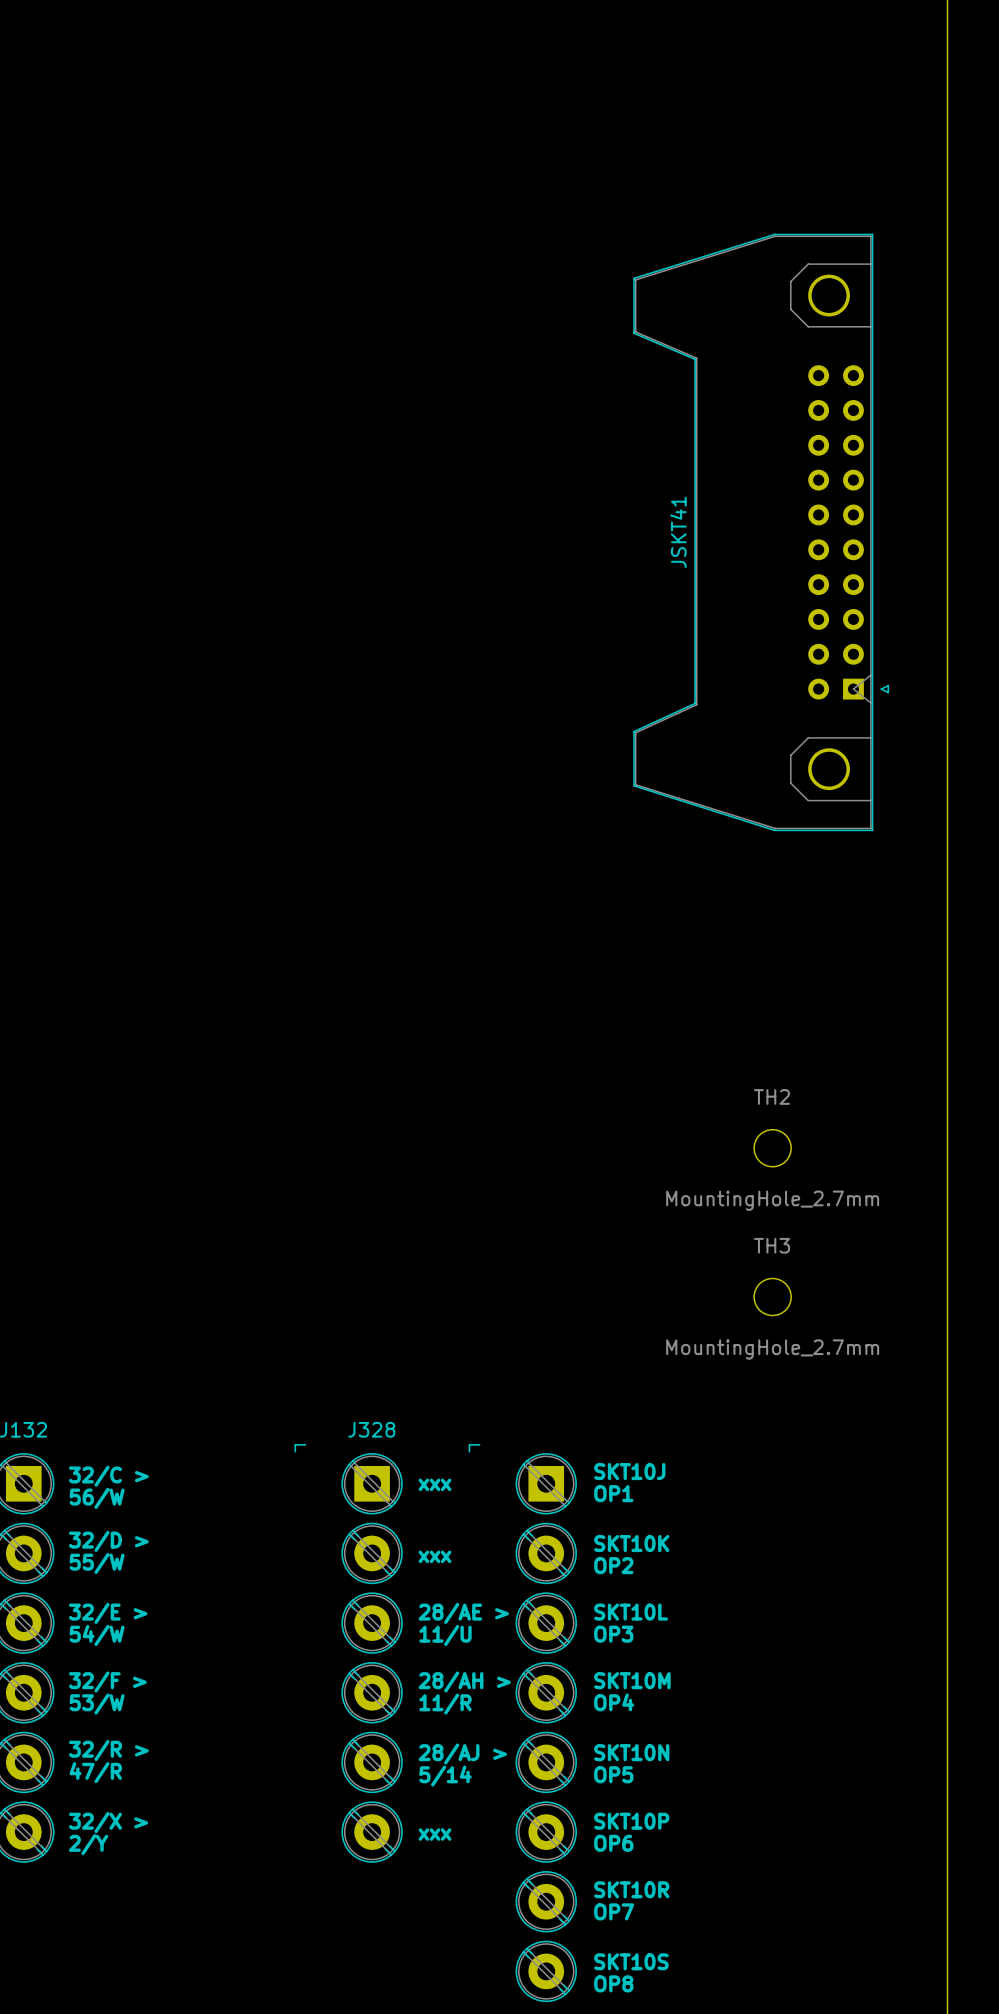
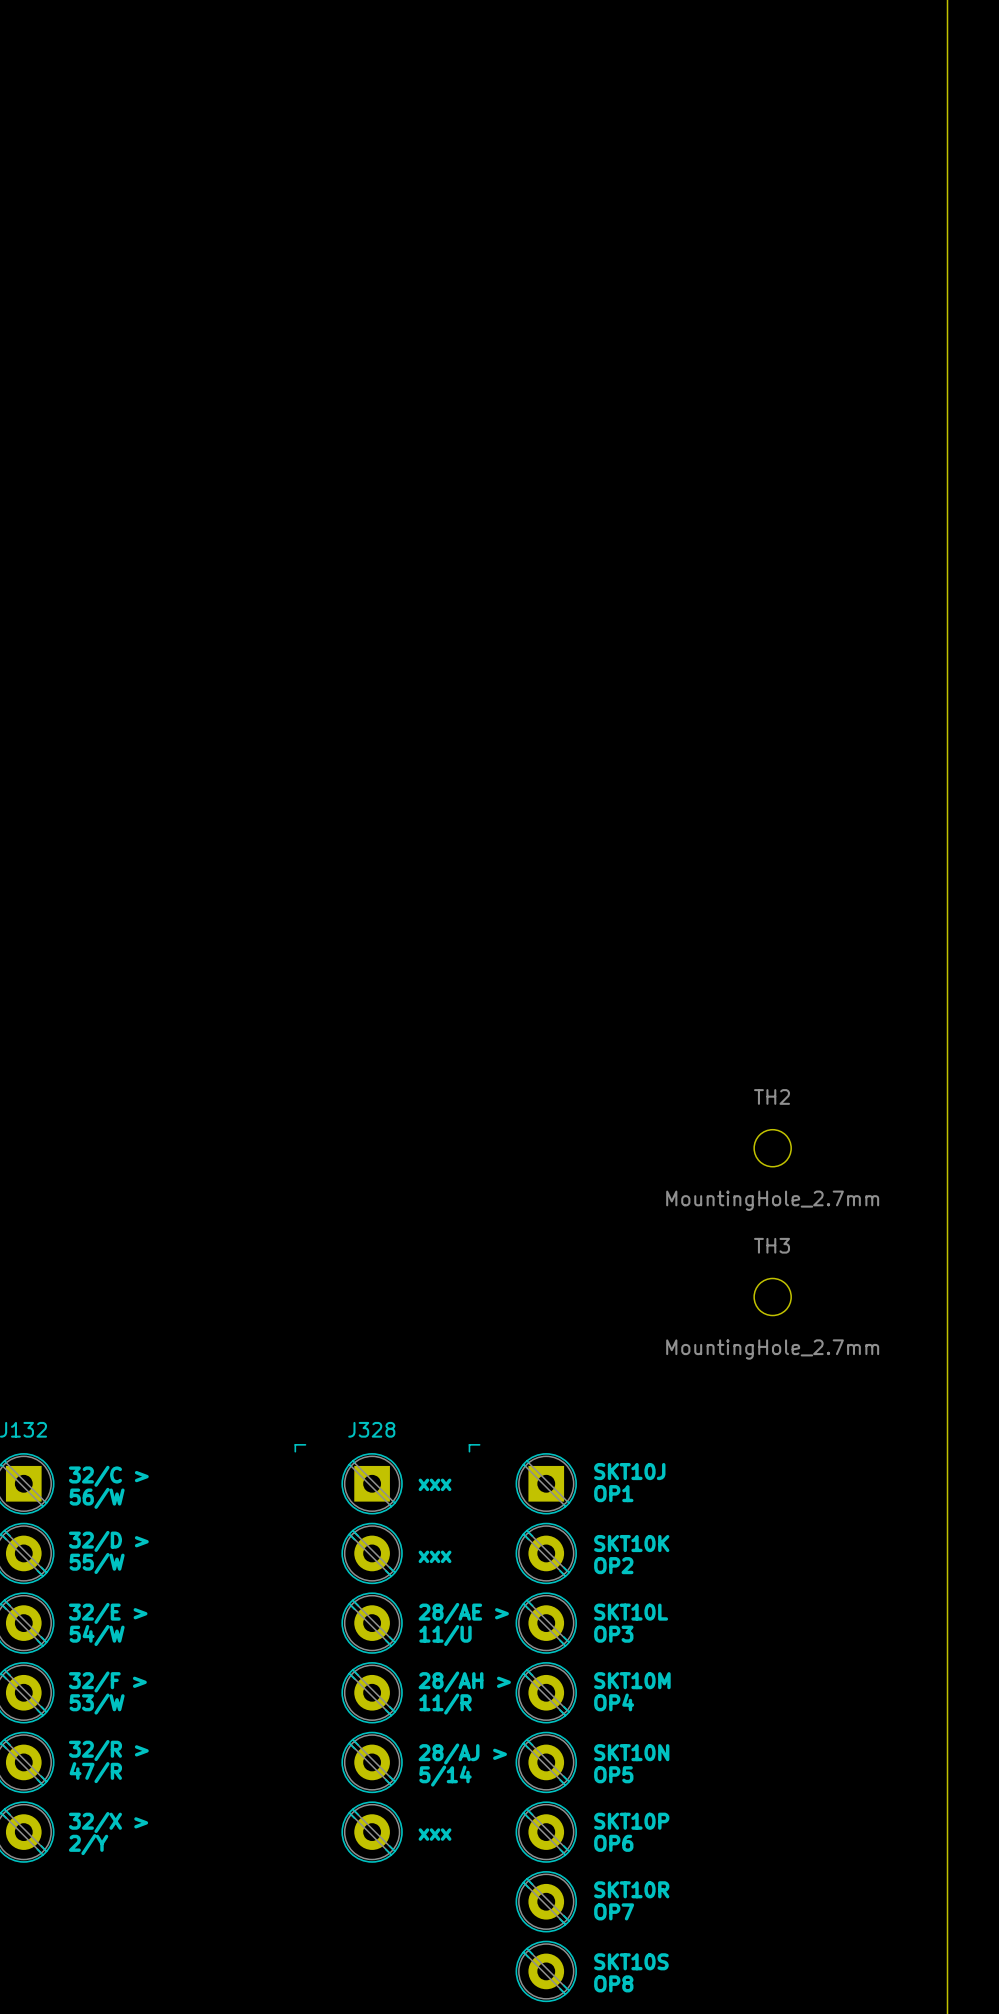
JSKT41: (761, 532) -> none

